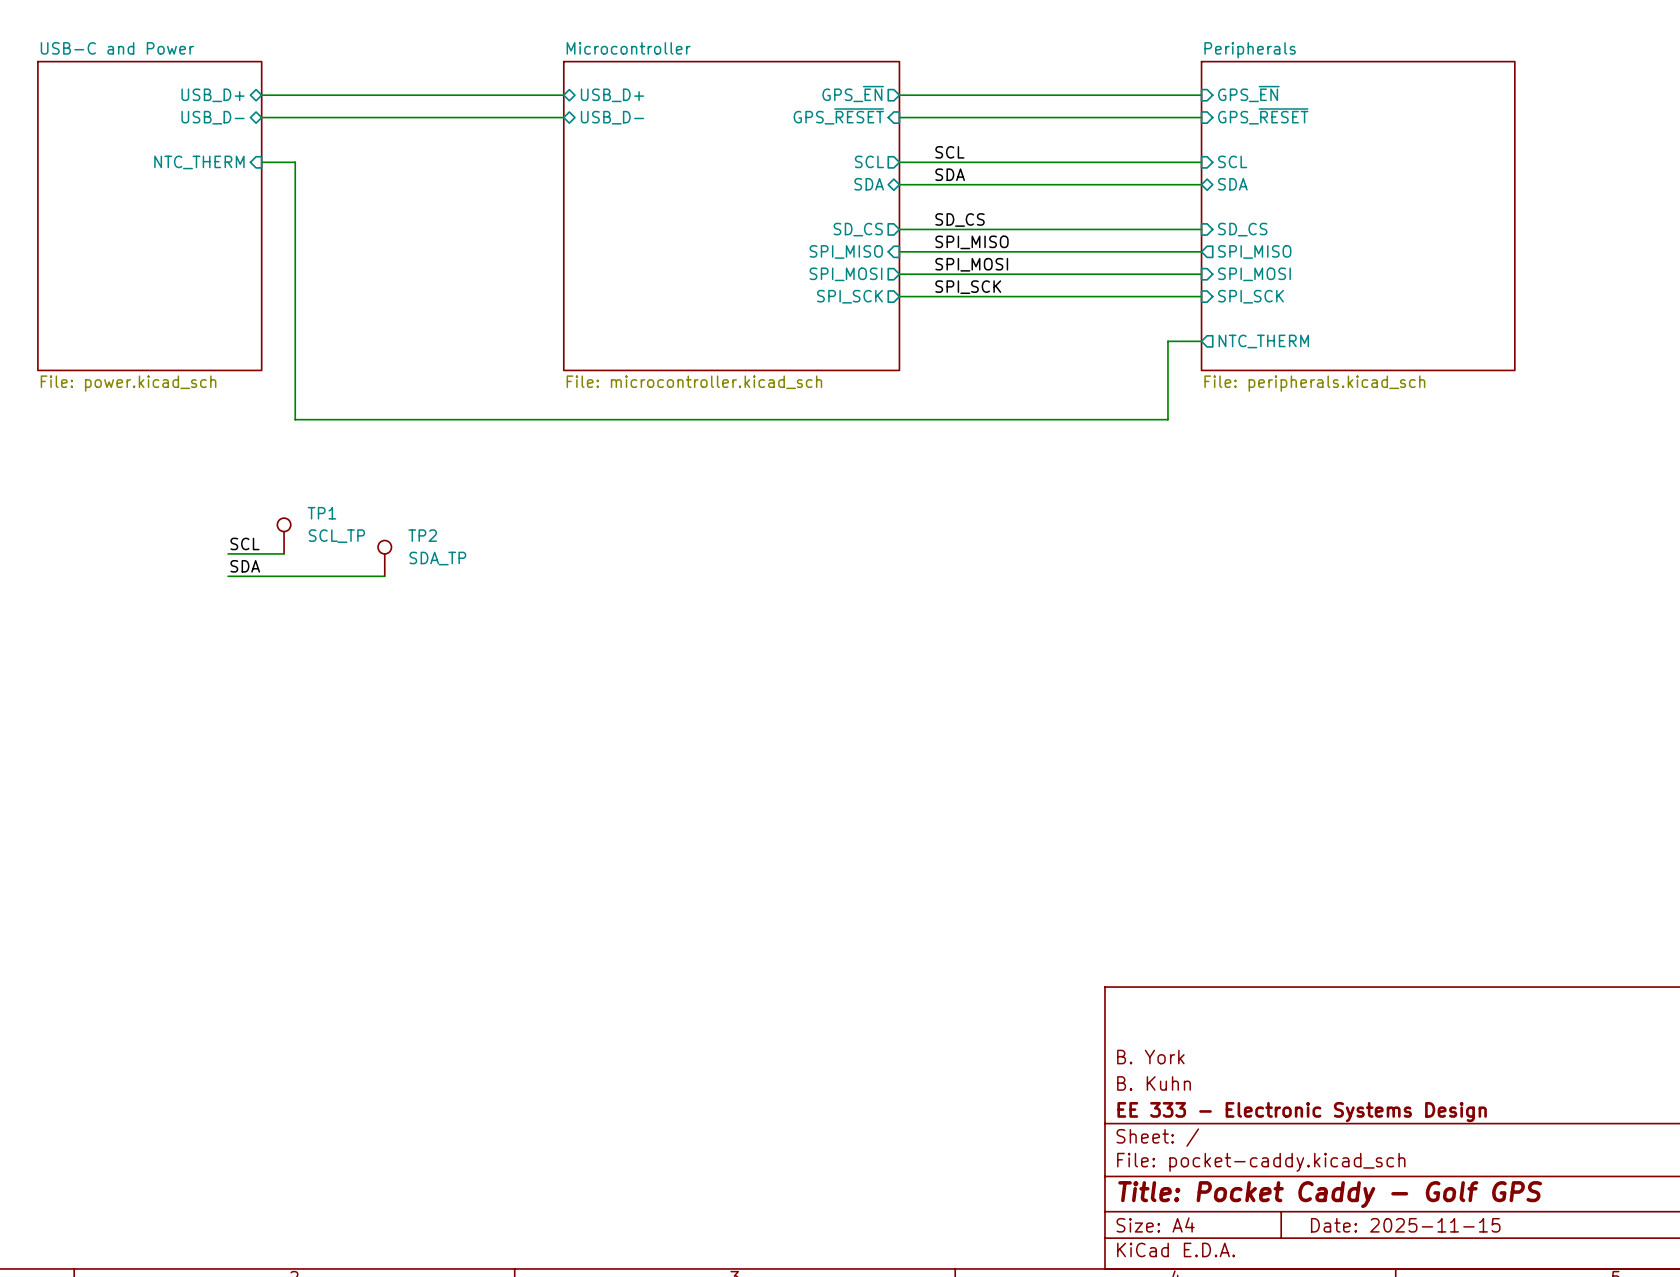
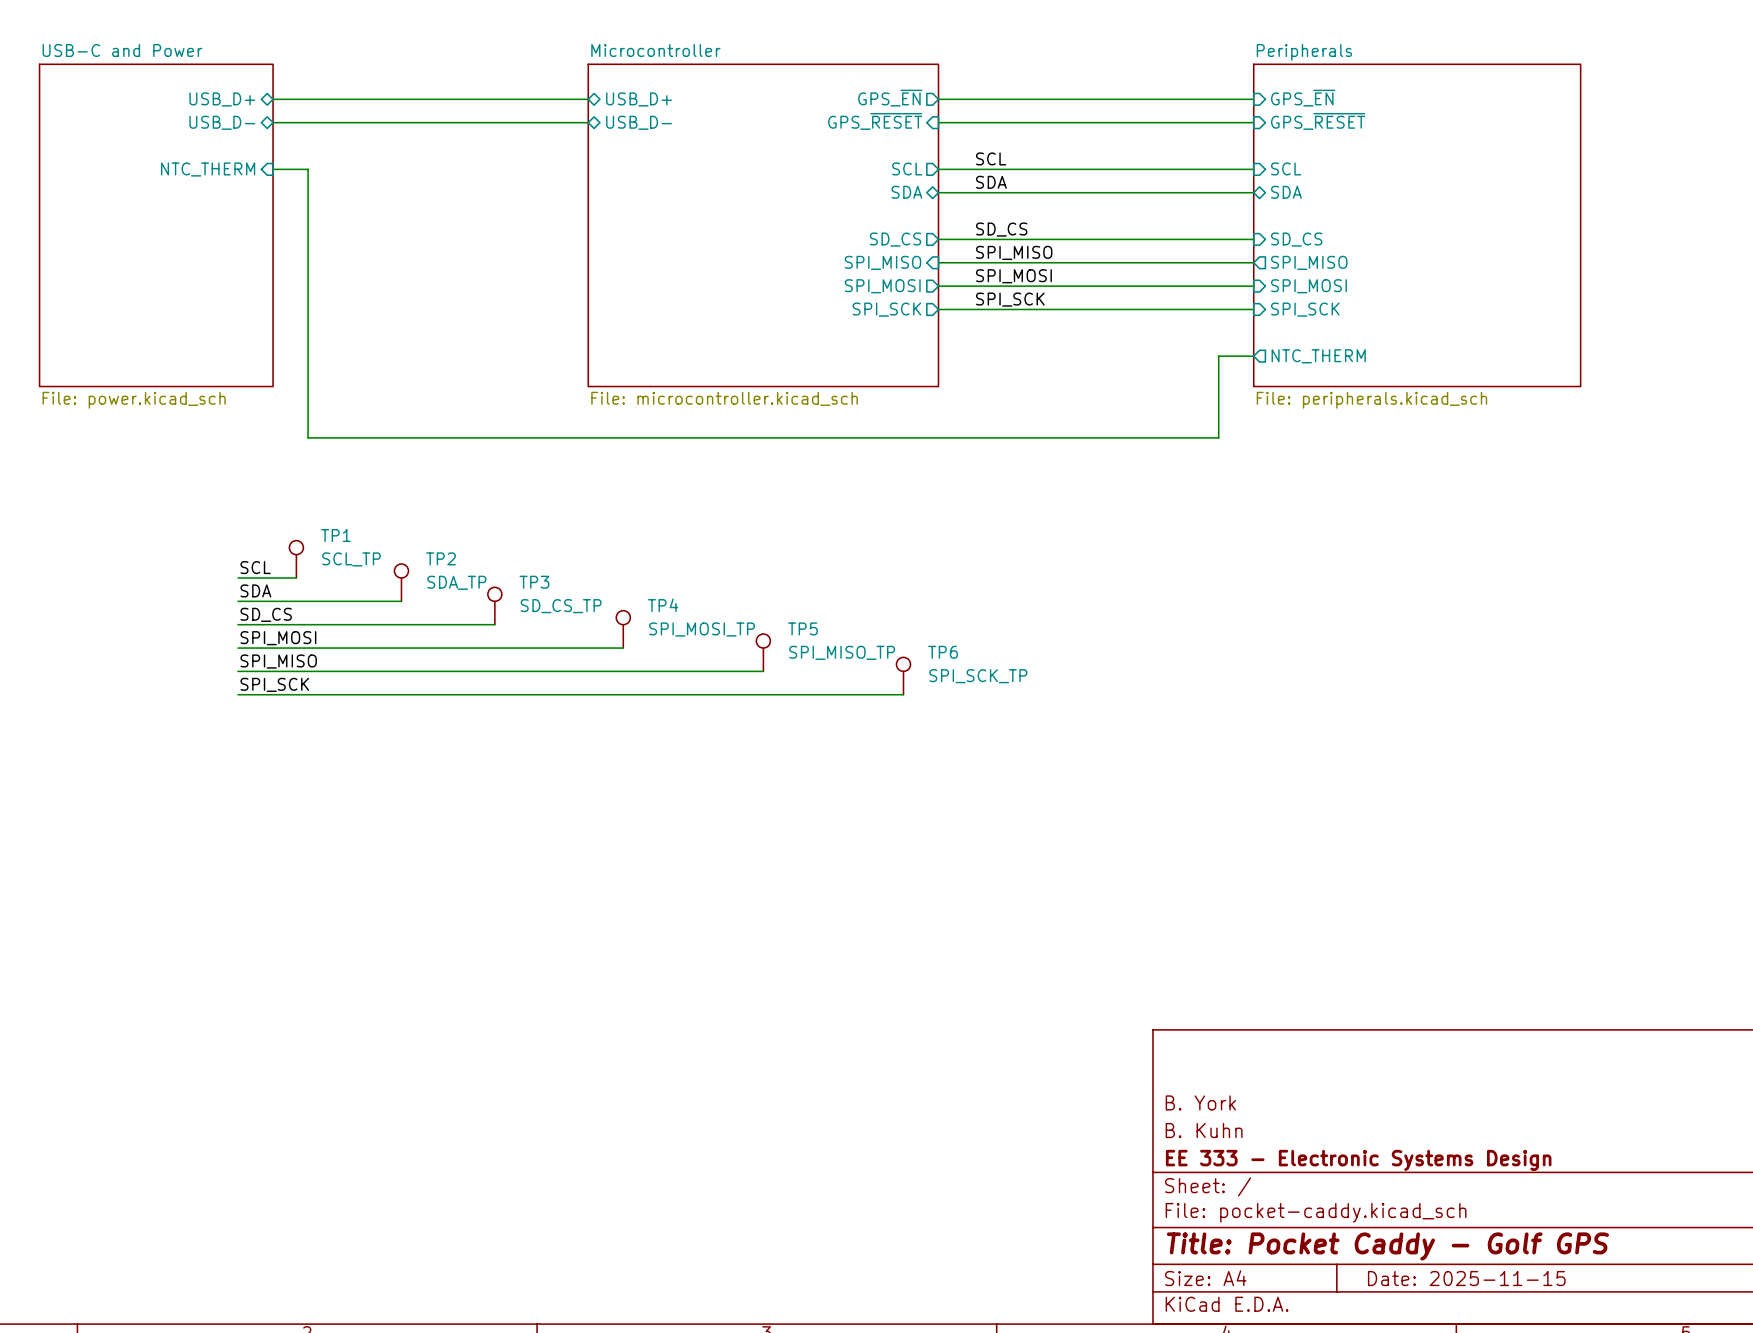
TP3: none -> SD_CS_TP (494, 606)
label: none -> SD_CS (266, 614)
wire: none -> (238, 624) (494, 624)
TP4: none -> SPI_MOSI_TP (623, 629)
label: none -> SPI_MOSI (278, 638)
wire: none -> (238, 648) (623, 648)
TP5: none -> SPI_MISO_TP (763, 652)
label: none -> SPI_MISO (278, 661)
wire: none -> (238, 671) (763, 671)
TP6: none -> SPI_SCK_TP (903, 676)
label: none -> SPI_SCK (274, 684)
wire: none -> (238, 694) (903, 694)

